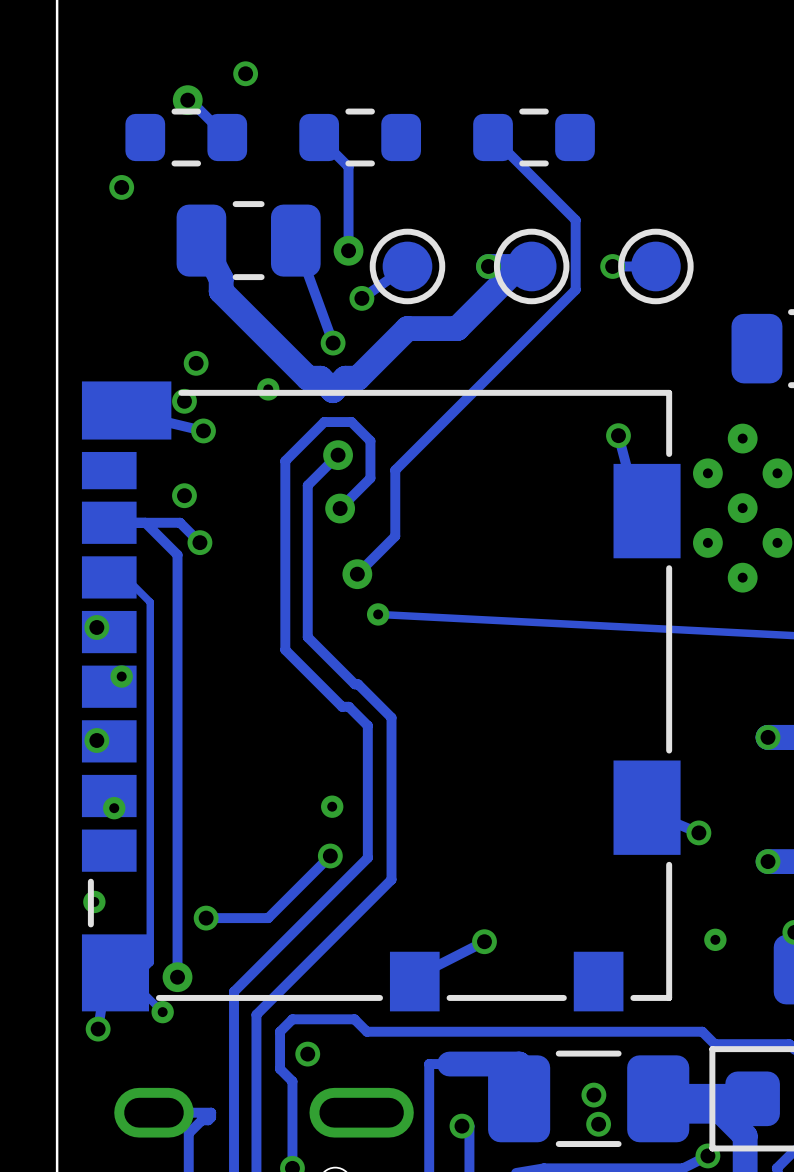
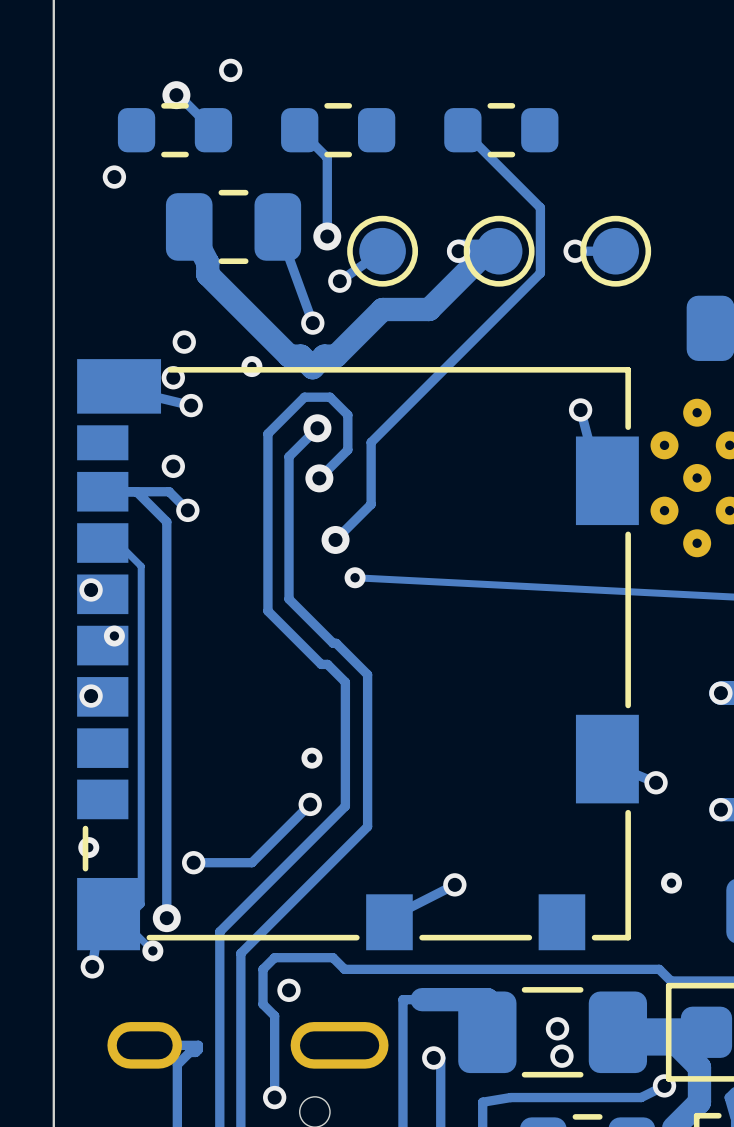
via: (114, 808) -> none

